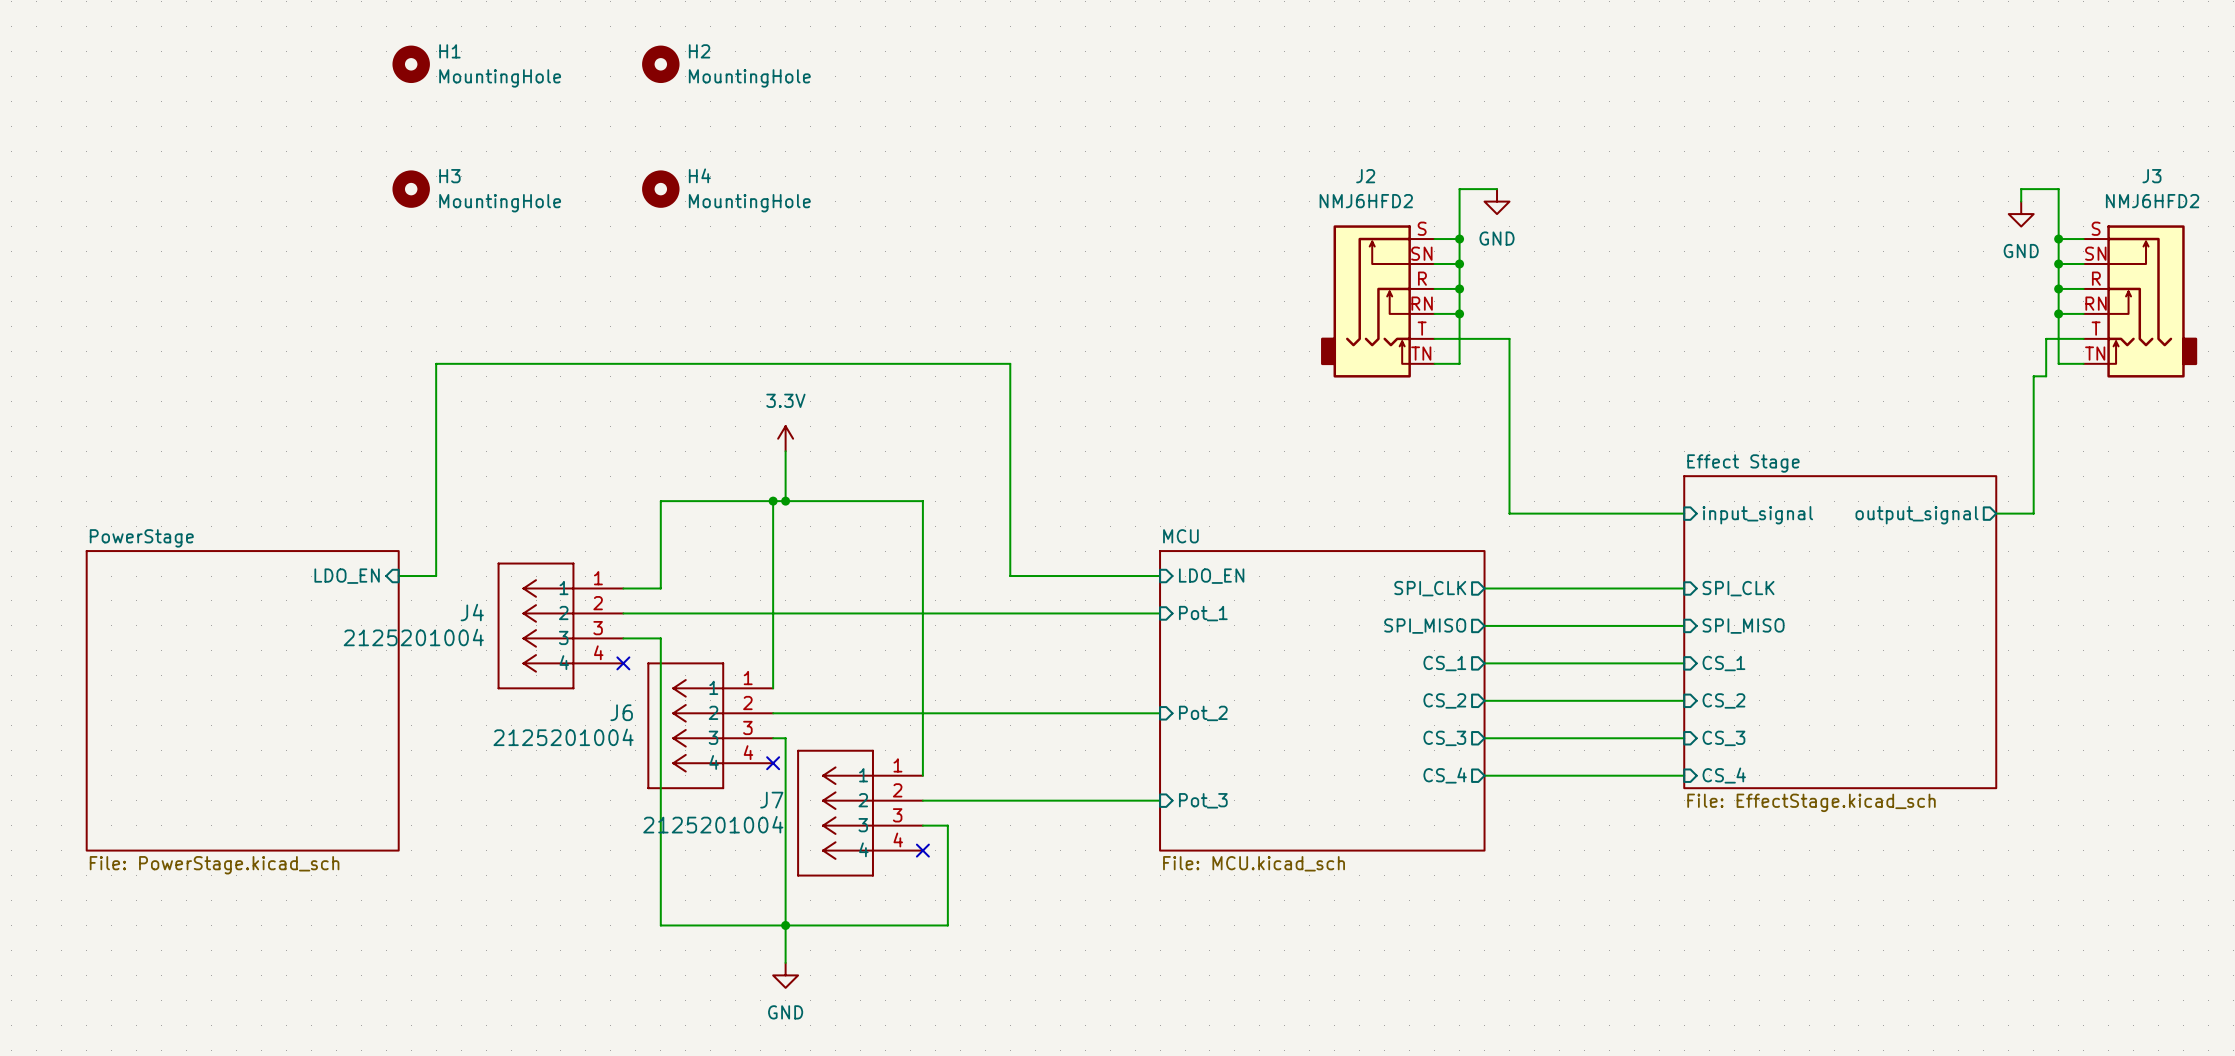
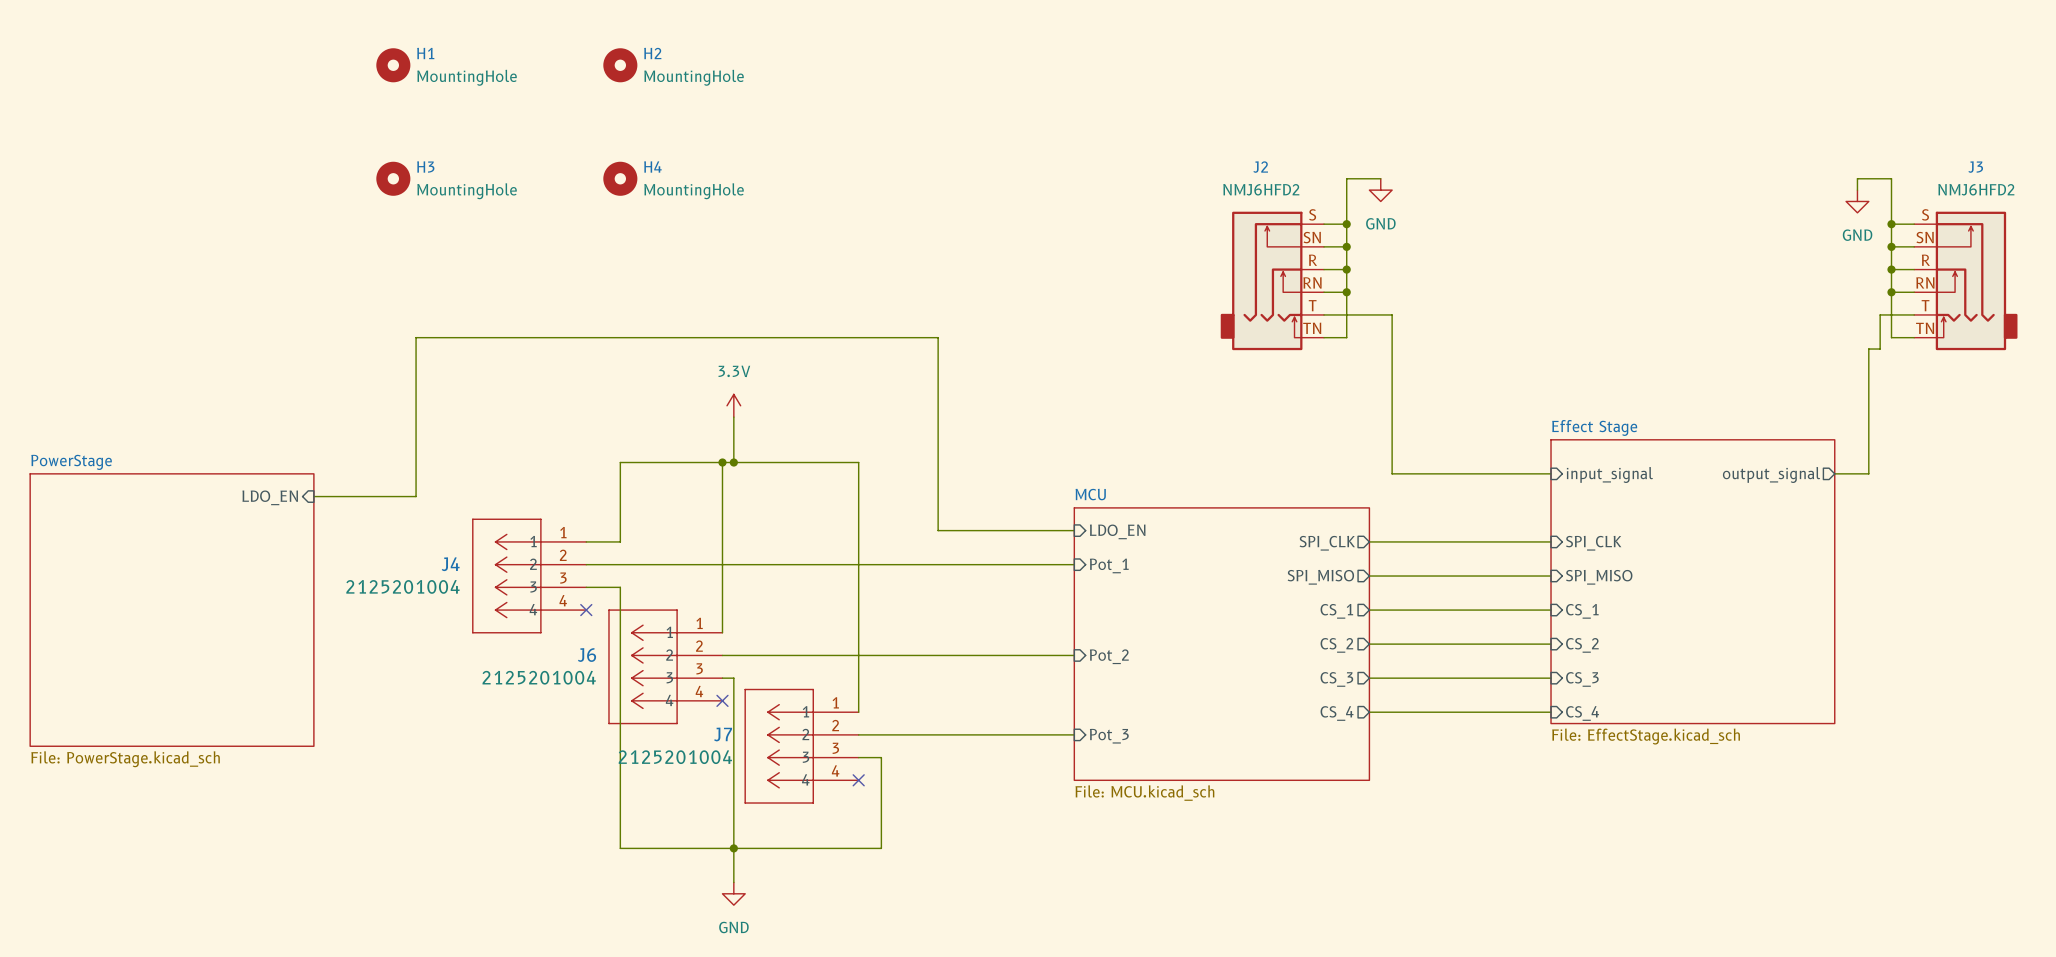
wire: (436, 538) (436, 576) (398, 576) -> (416, 496) (313, 496)
sheet pin position: LDO_EN (347, 576) -> LDO_EN (270, 497)
sheet PowerStage position: (242, 700) -> (172, 610)

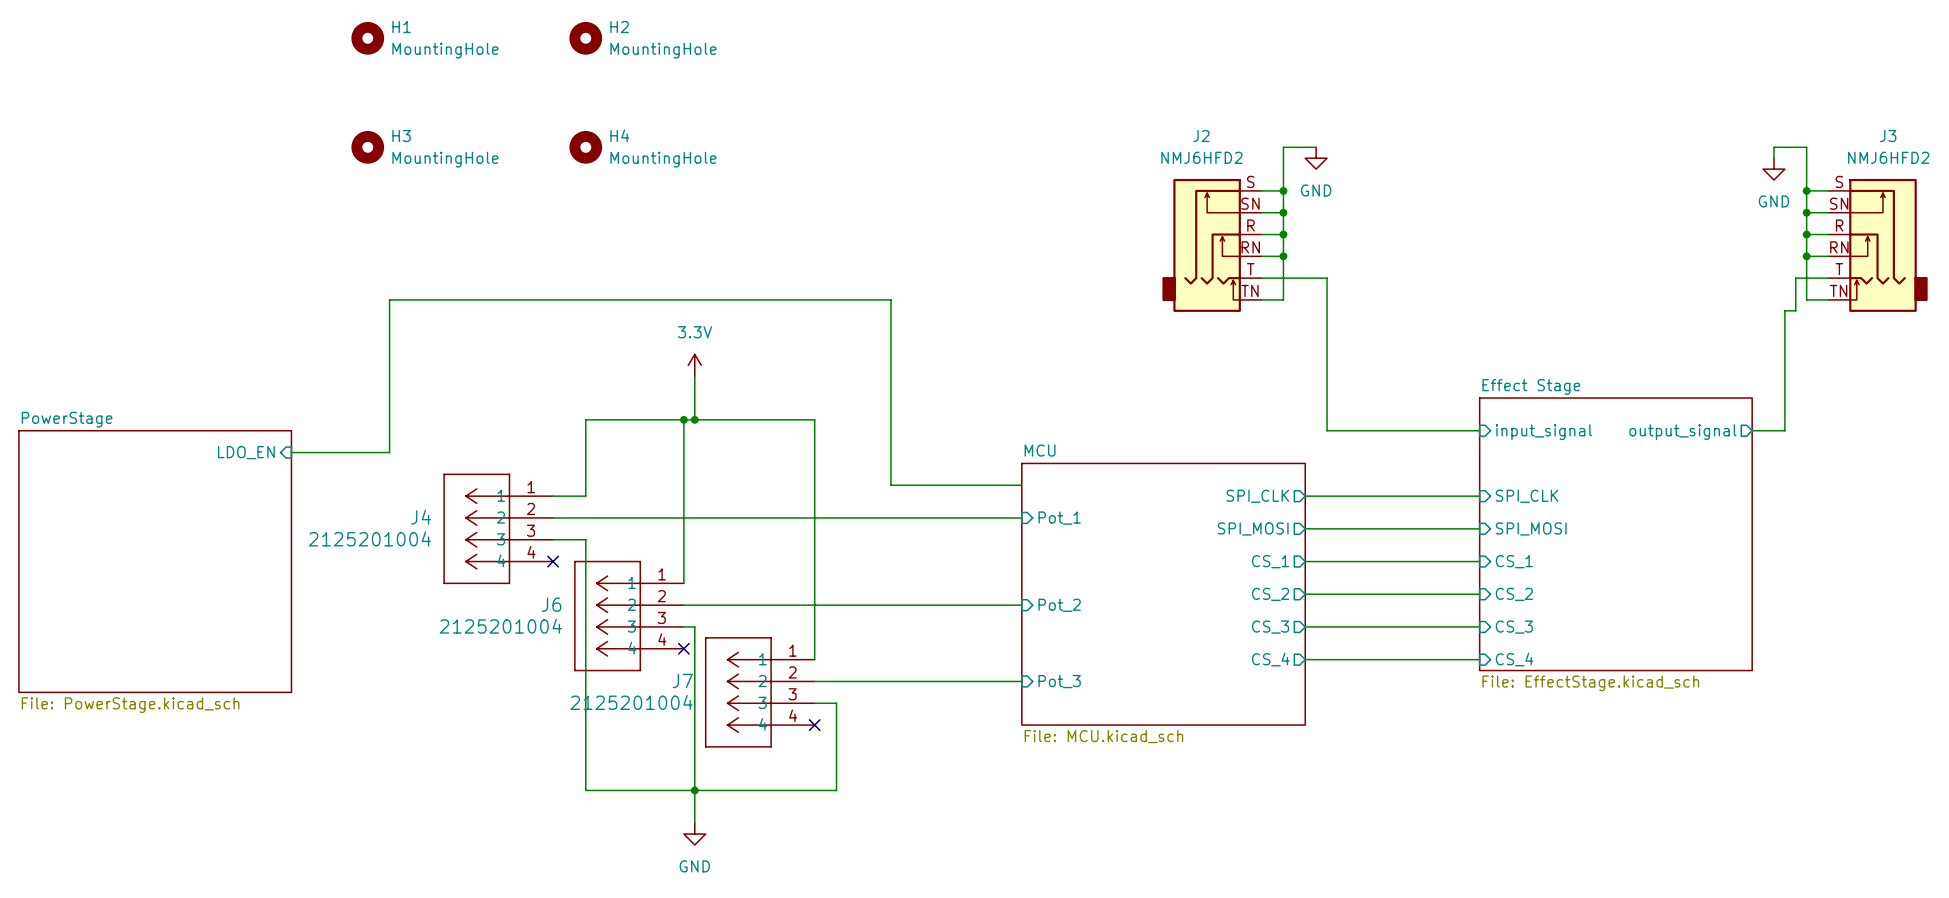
sheet pin: LDO_EN (1117, 531) -> none
sheet pin: SPI_MISO (1320, 577) -> SPI_MOSI (1253, 528)
sheet pin: SPI_MISO (1599, 577) -> SPI_MOSI (1531, 528)

